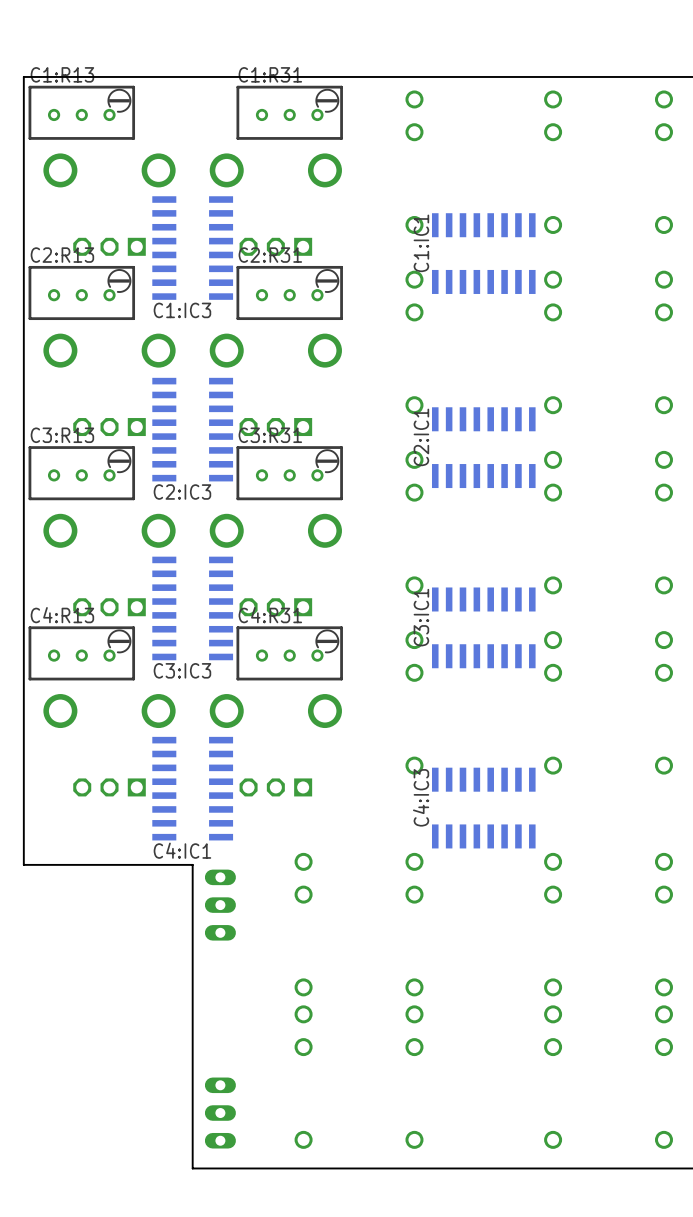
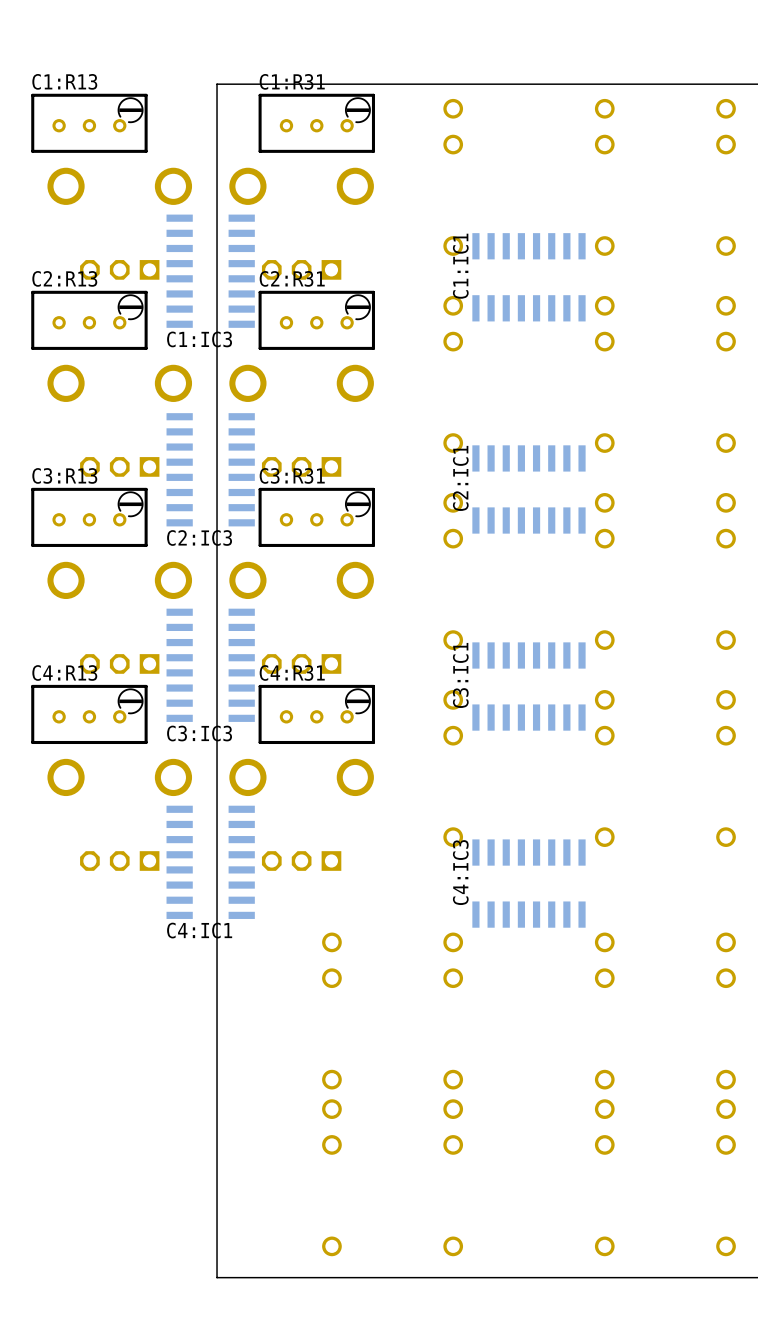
board edge: (198, 76) (23, 76) (23, 864) (192, 864) (192, 1168) (198, 1168) -> (217, 84) (217, 1277)
part: (220, 905) -> none
part: (220, 1113) -> none

